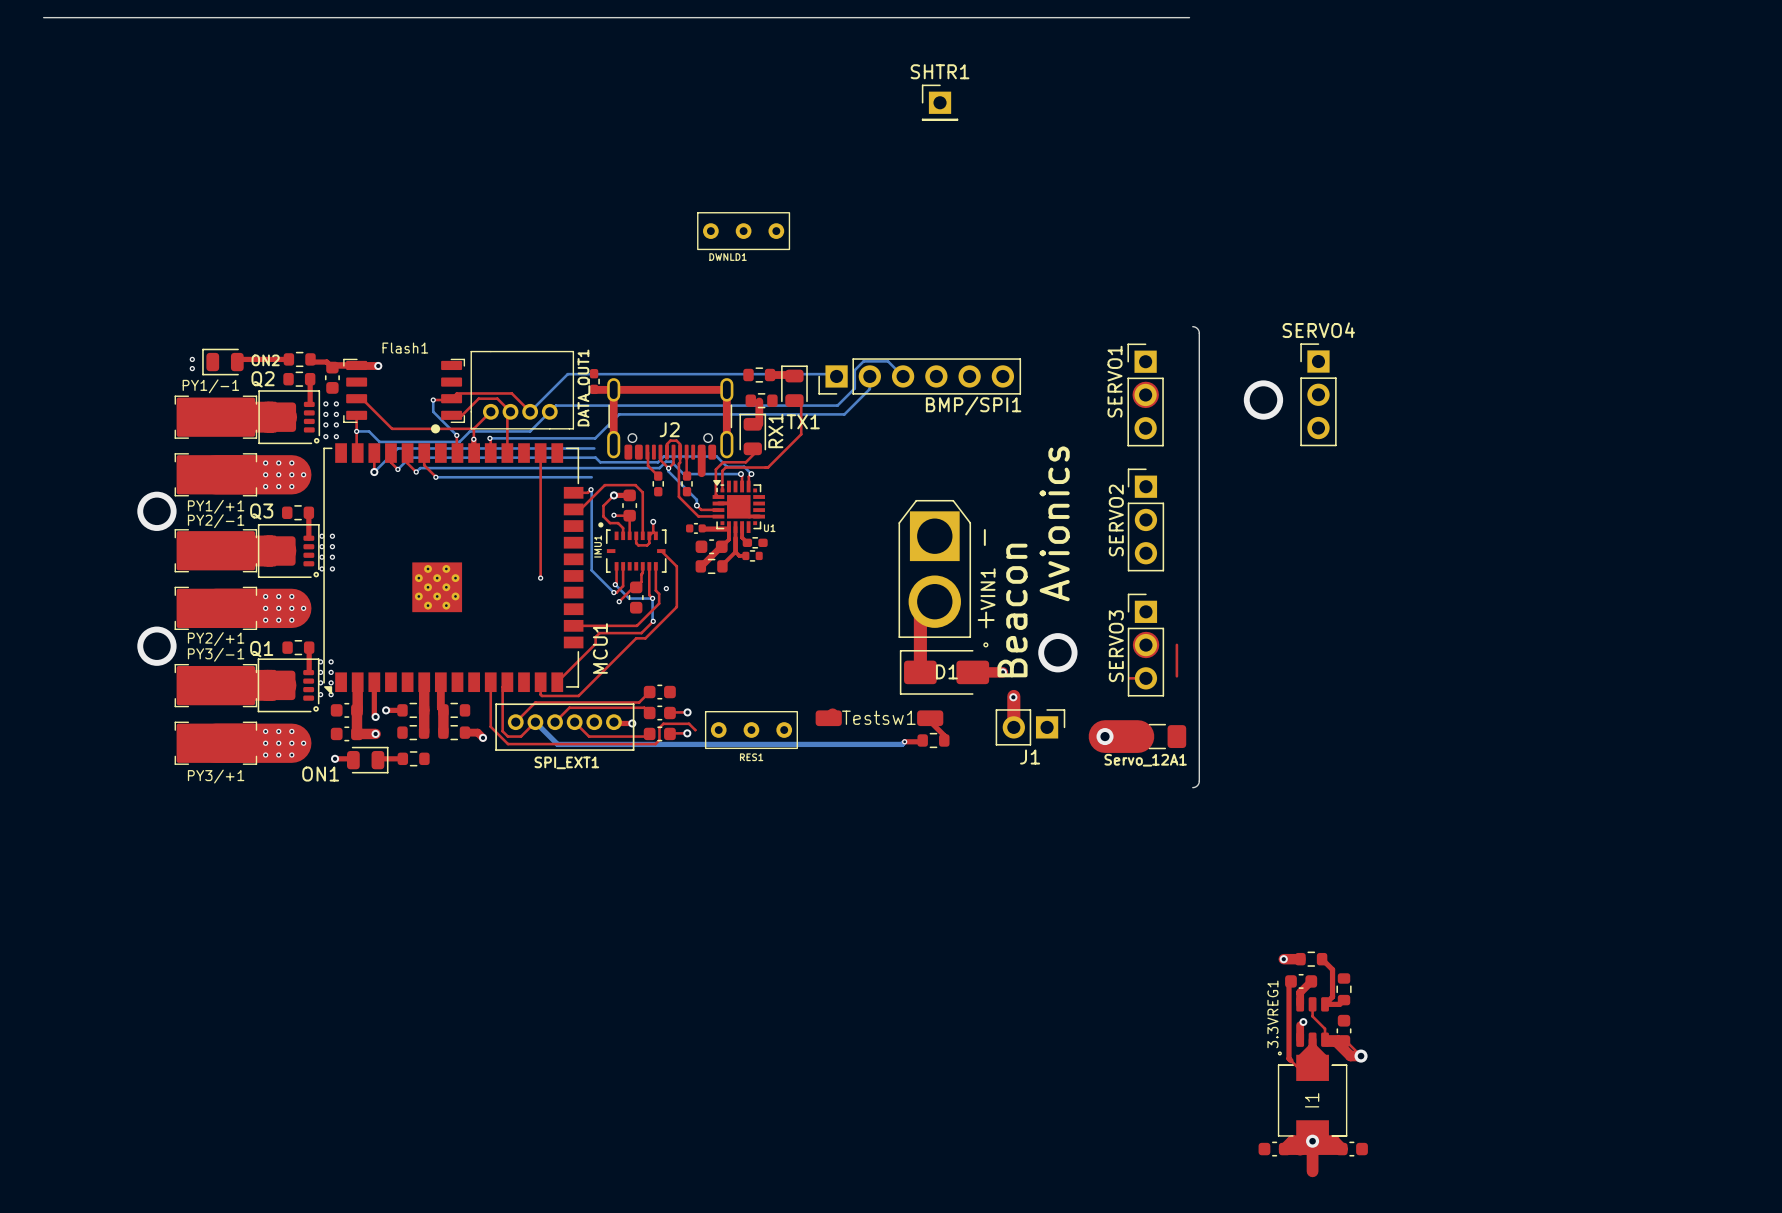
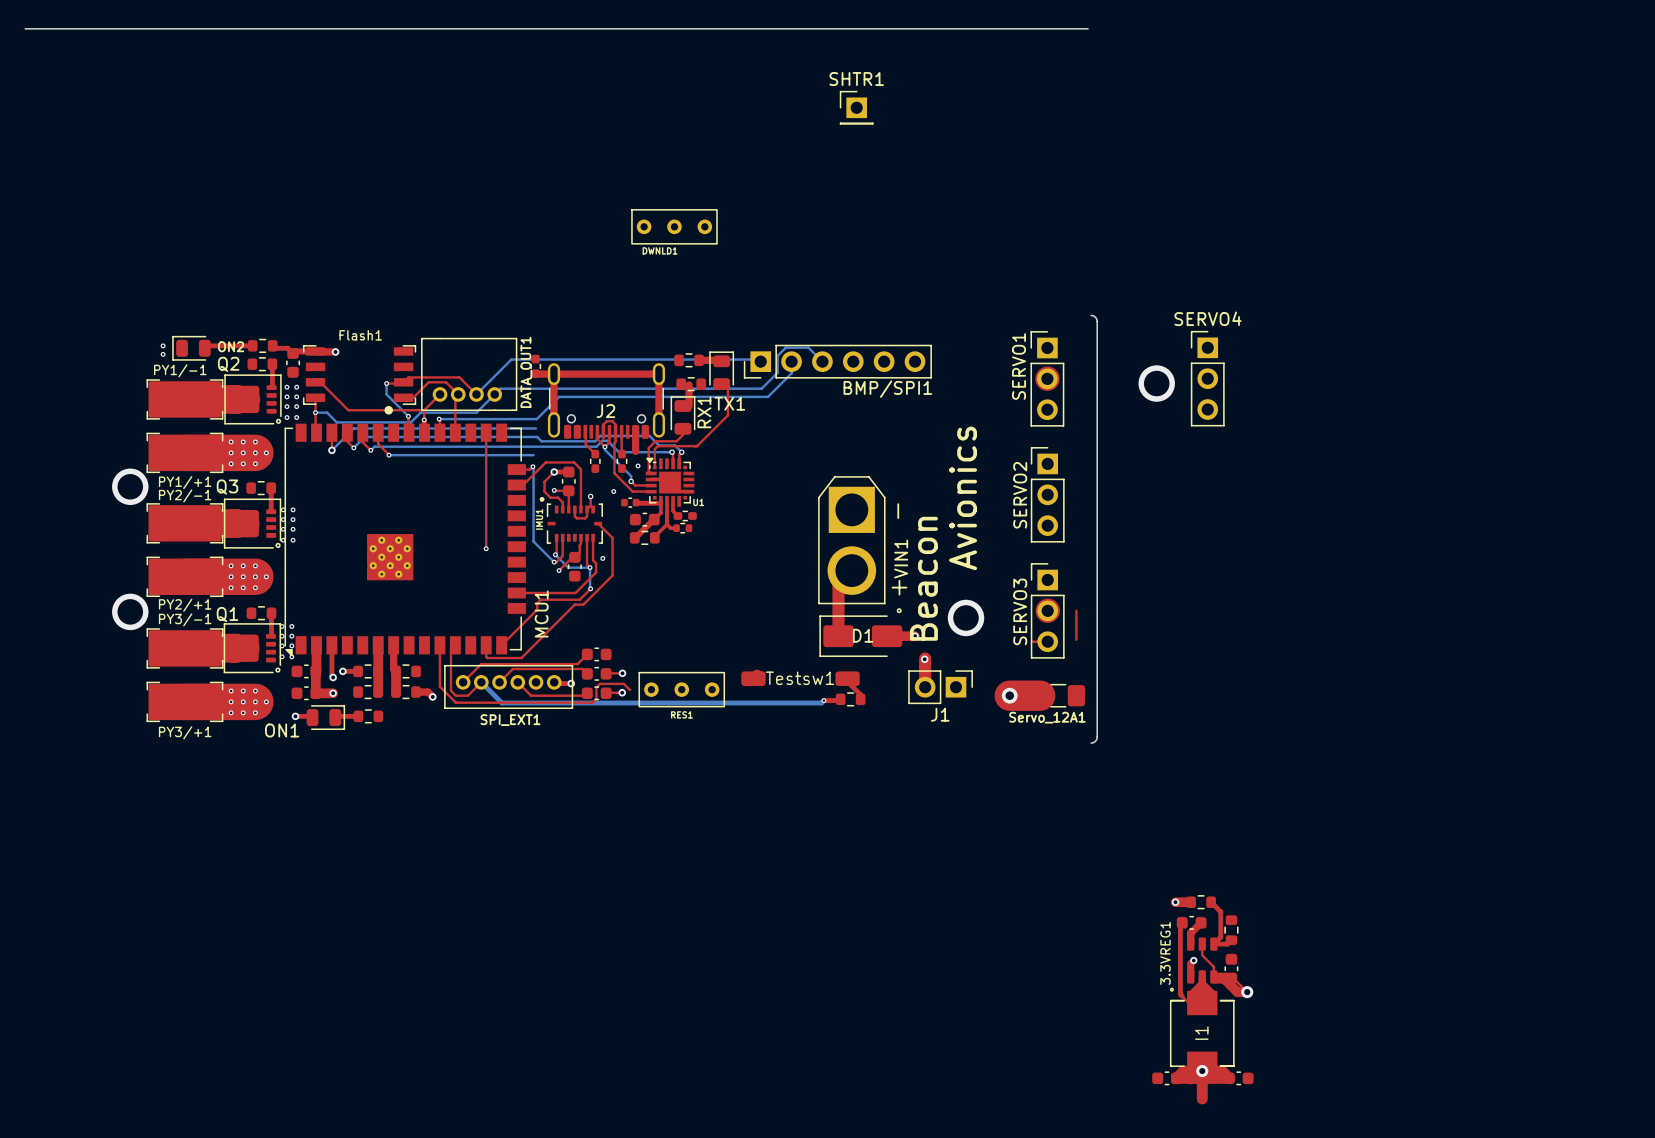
via: none -> (638, 466)
via: none -> (613, 491)

